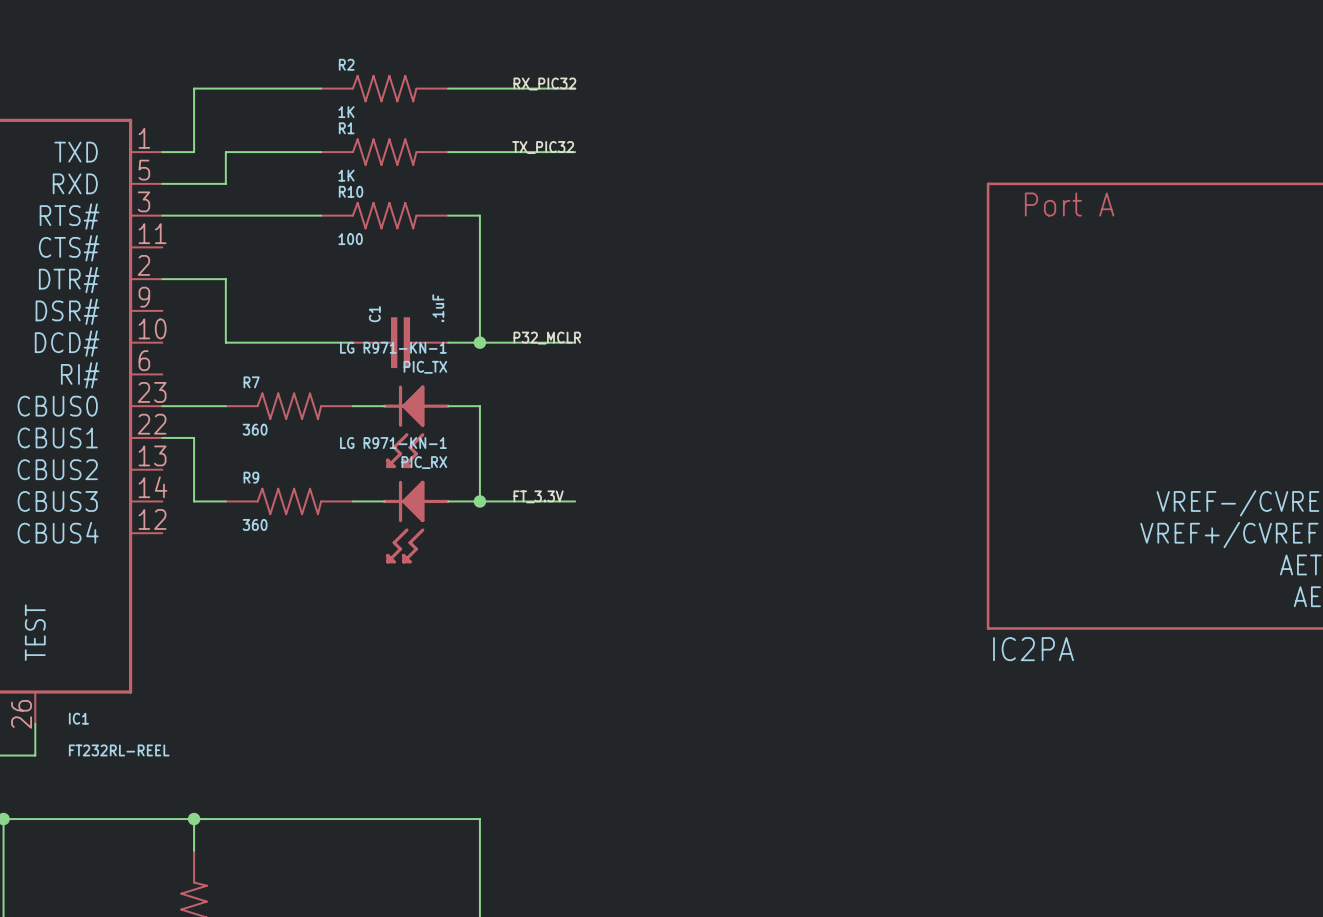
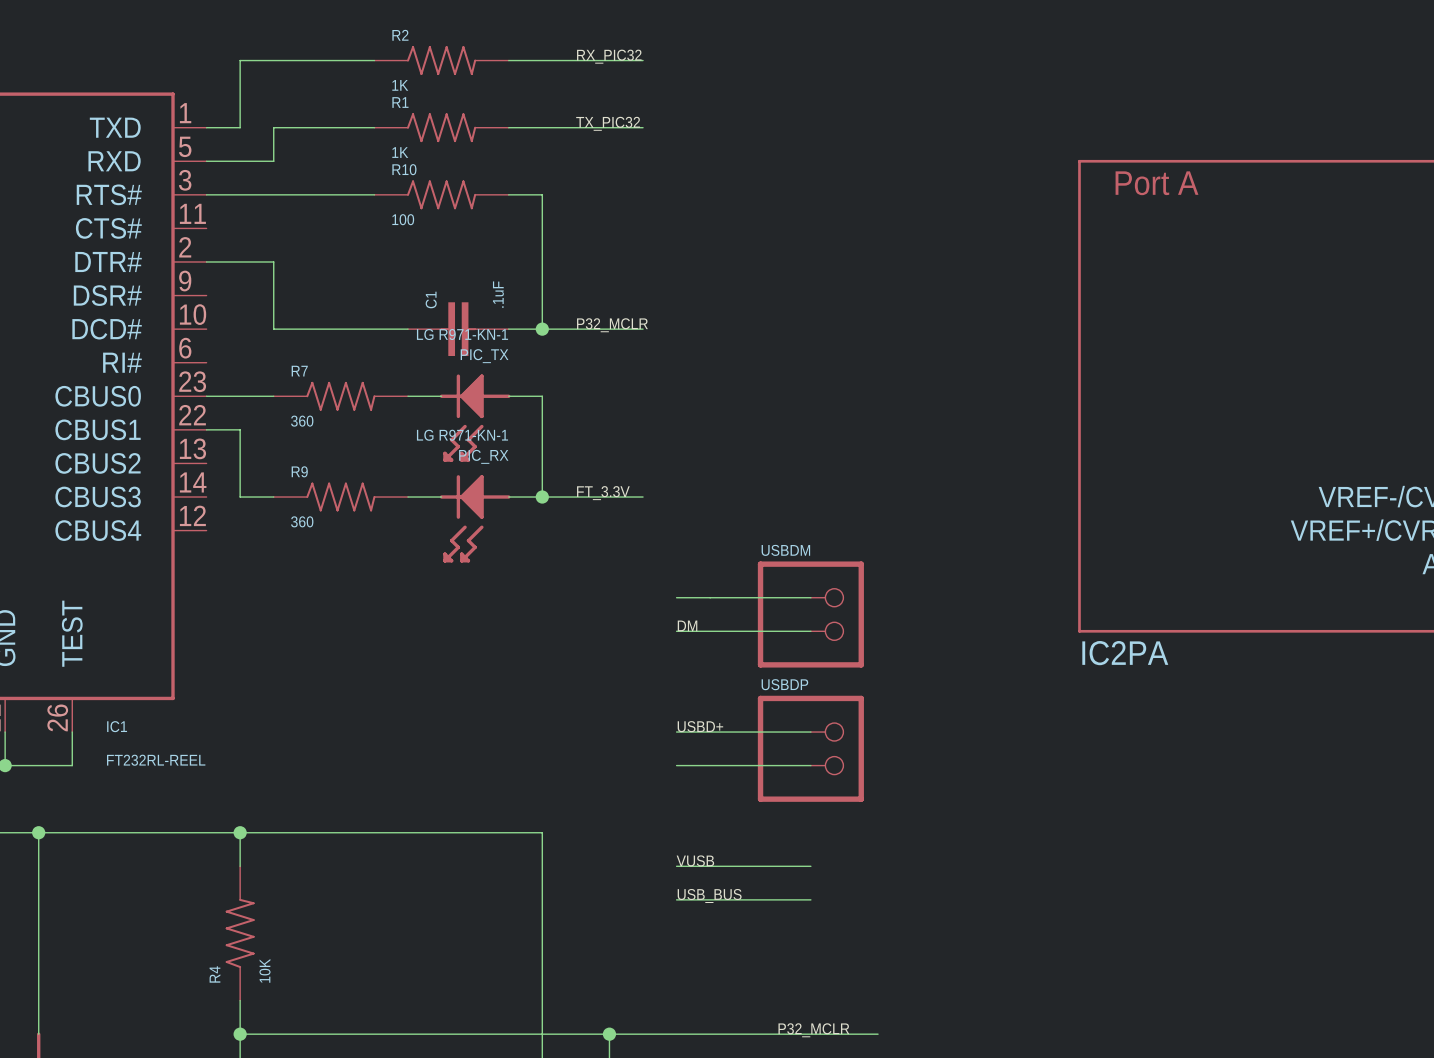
wire: none -> (676, 597) (810, 597)
USBDM: none -> (810, 614)
label: none -> DM (687, 625)
wire: none -> (676, 631) (810, 631)
label: none -> USBD+ (700, 726)
wire: none -> (676, 732) (810, 732)
USBDP: none -> (810, 748)
wire: none -> (676, 765) (810, 765)
label: none -> VUSB (695, 860)
wire: none -> (676, 866) (810, 866)
label: none -> USB_BUS (709, 895)
wire: none -> (676, 899) (810, 899)

